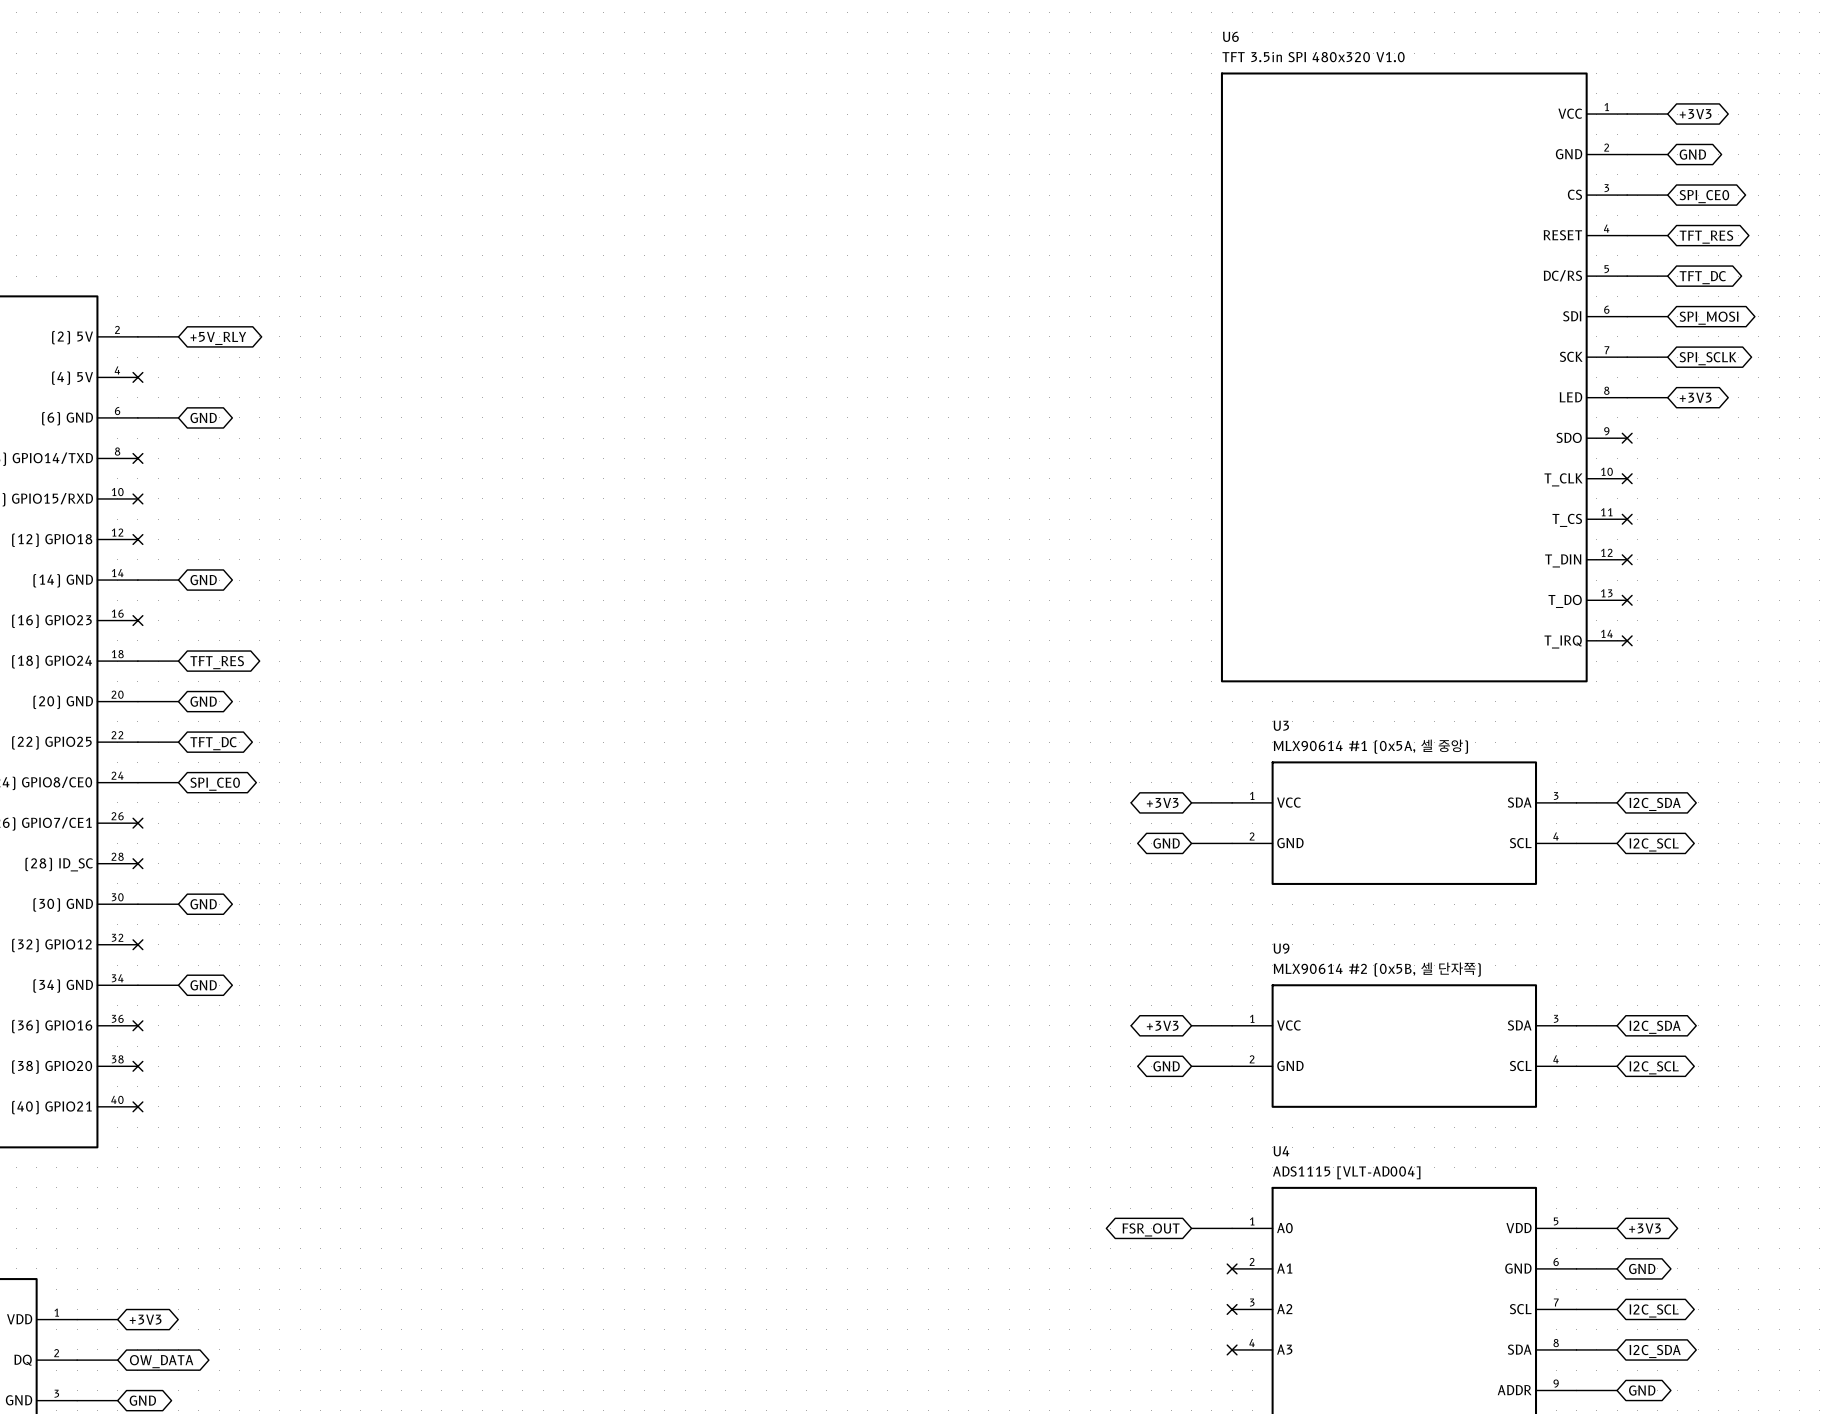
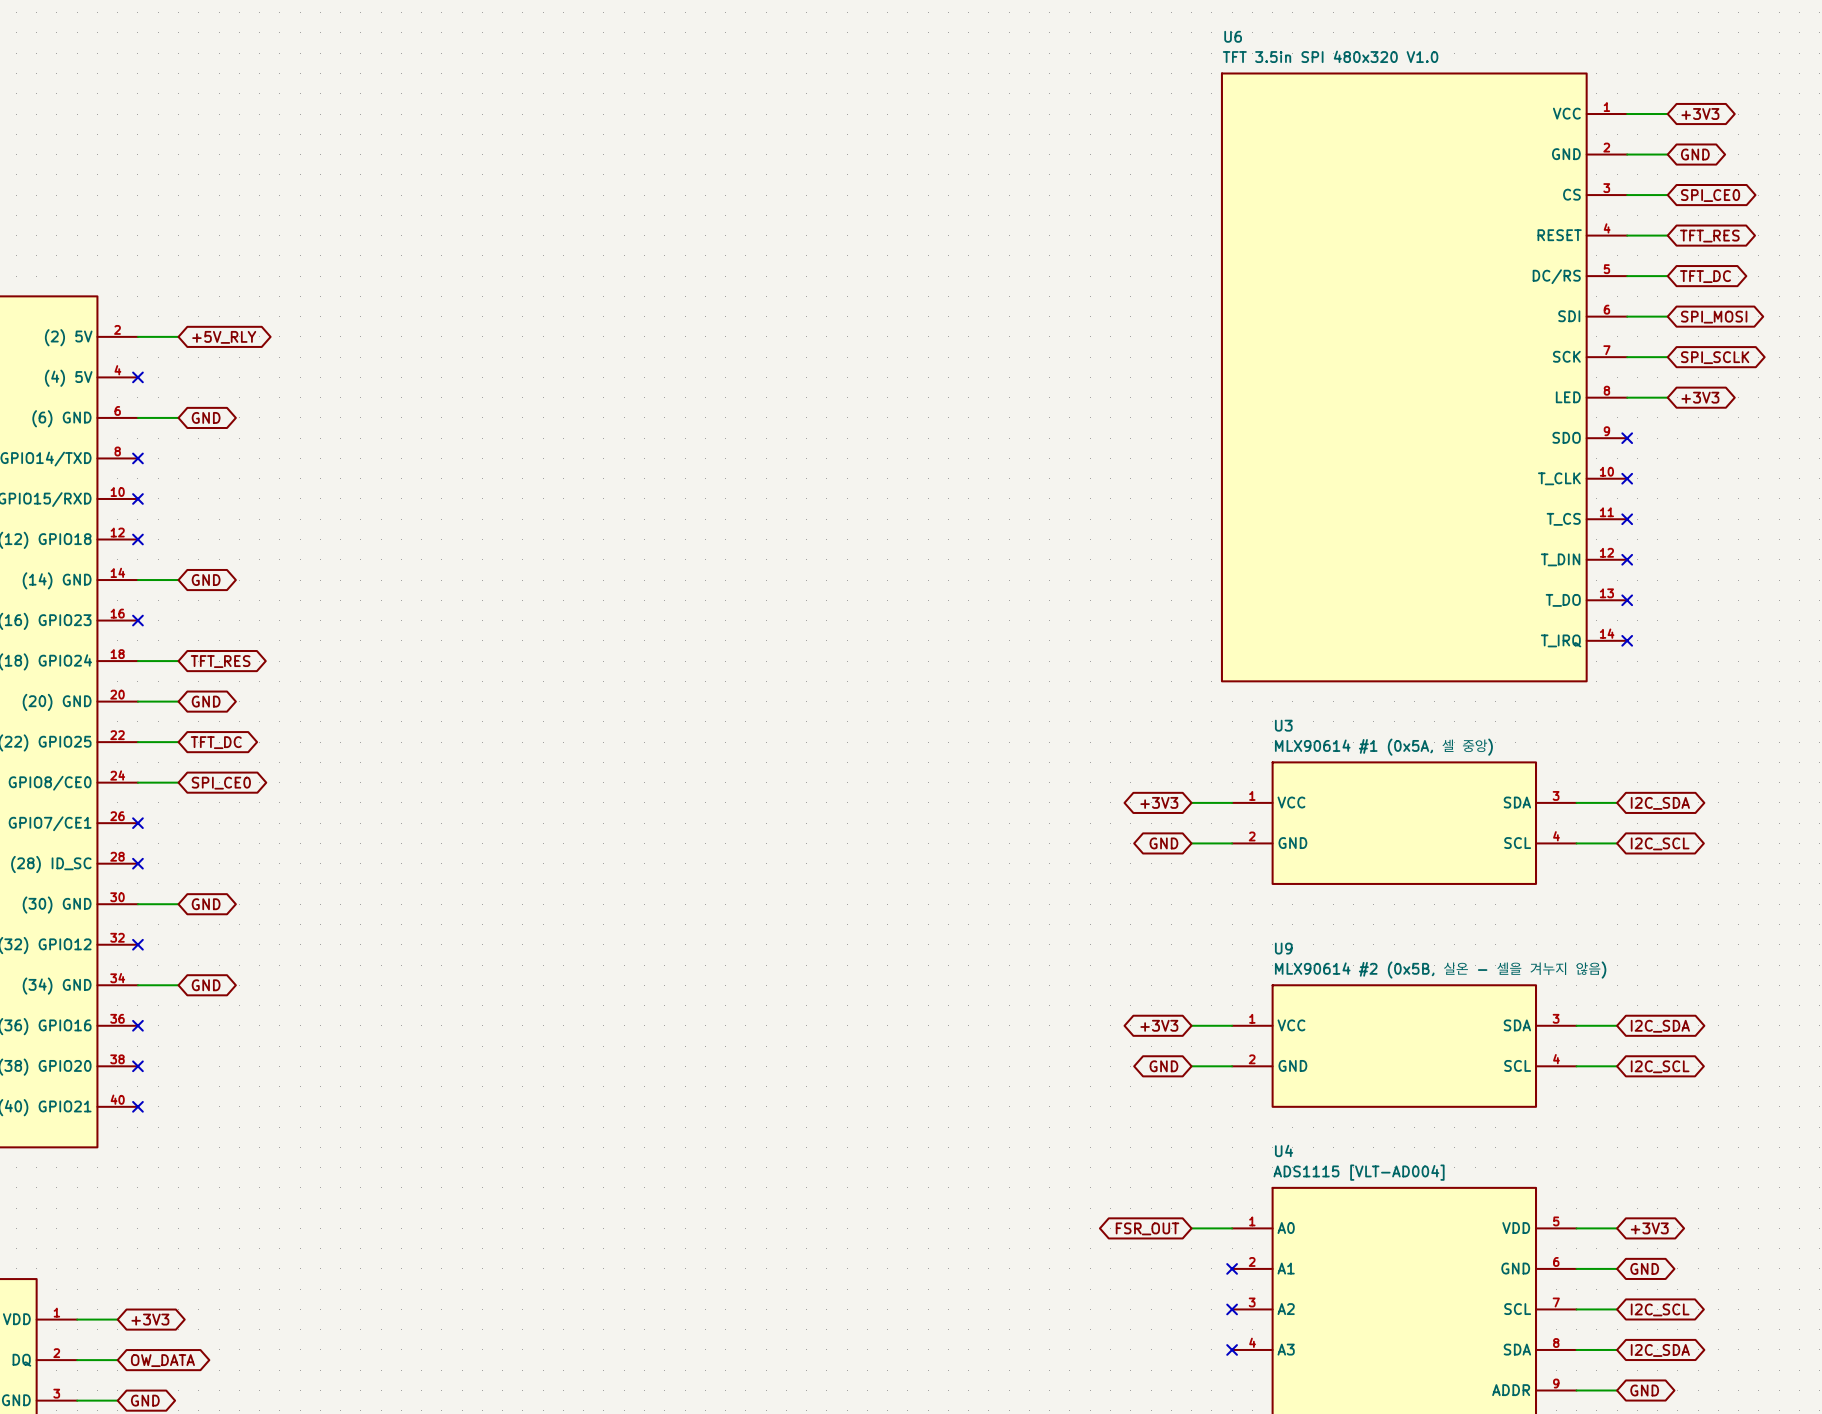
U9 value: MLX90614 #2 (0x5B, 셀 단자쪽) (1377, 969) -> MLX90614 #2 (0x5B, 실온 - 셀을 겨누지 않음) (1440, 970)

